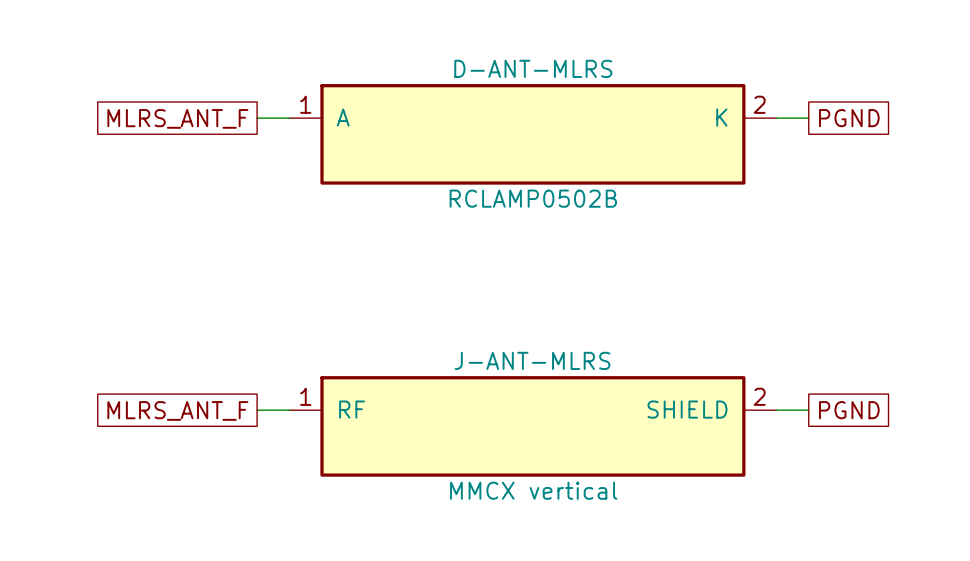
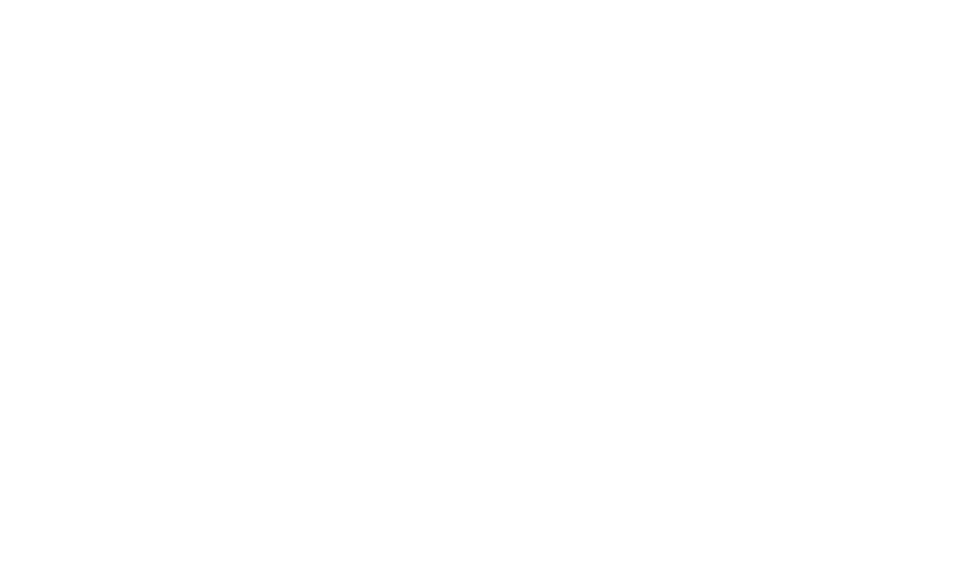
global label: MLRS_ANT_F (177, 118) -> none
wire: (257, 118) (289, 118) -> none
wire: (776, 118) (808, 118) -> none
global label: PGND (849, 118) -> none
D-ANT-MLRS: RCLAMP0502B (532, 134) -> none
global label: MLRS_ANT_F (177, 410) -> none
wire: (257, 410) (289, 410) -> none
wire: (776, 410) (808, 410) -> none
global label: PGND (849, 410) -> none
J-ANT-MLRS: MMCX vertical (532, 426) -> none

